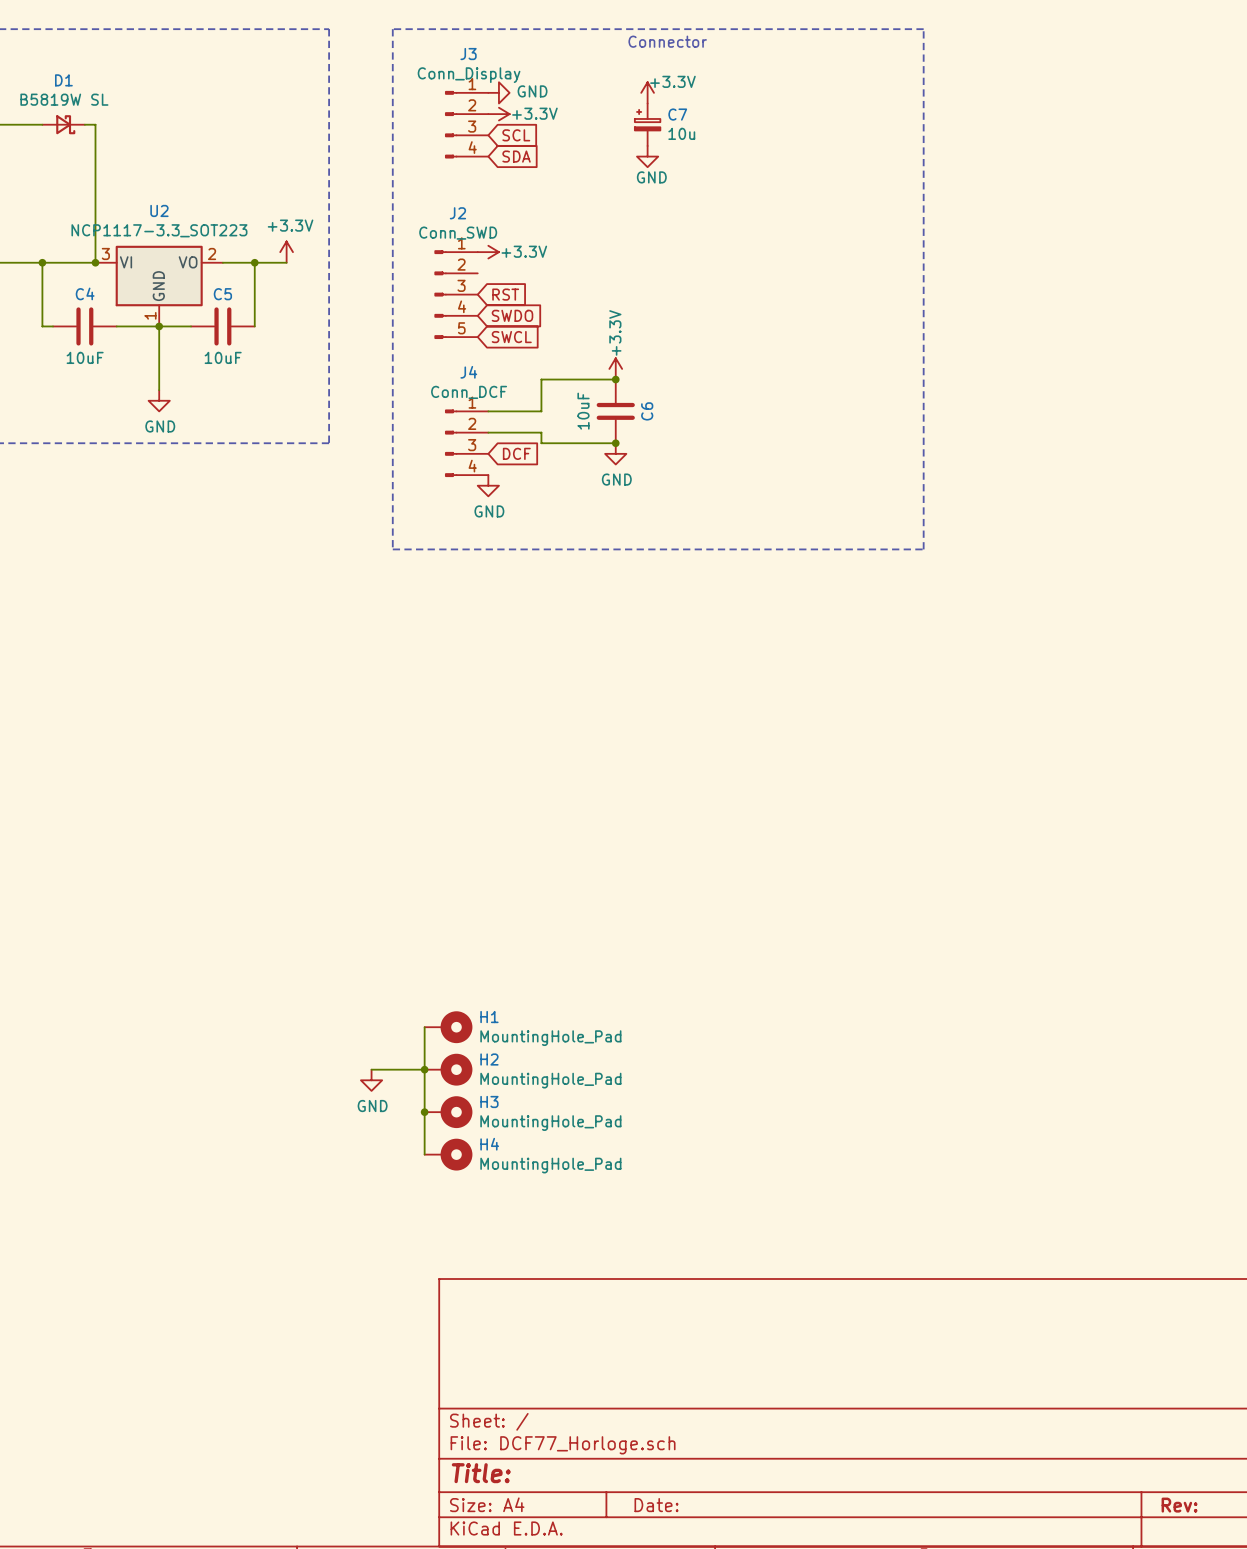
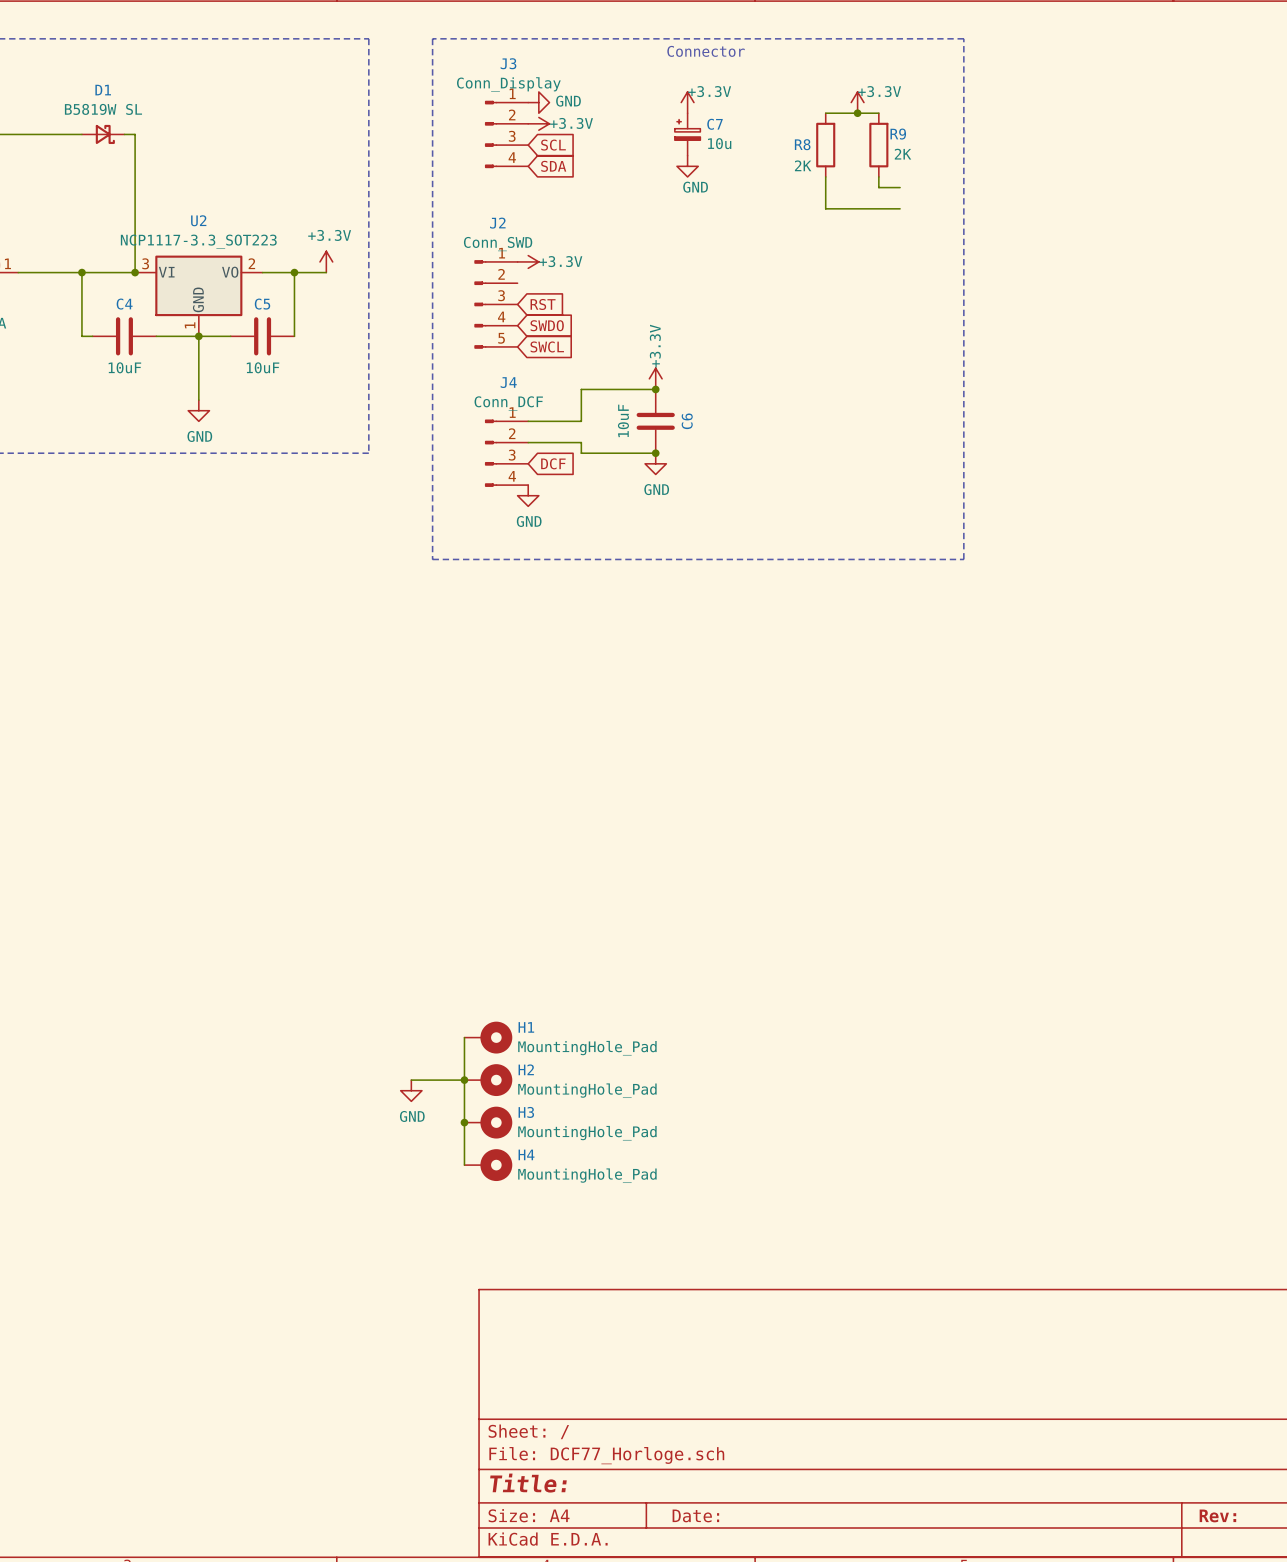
power symbol: none -> +3.3V (857, 102)
wire: none -> (825, 113) (878, 113)
junction: none -> (857, 113)
R8: none -> 2K (825, 145)
R9: none -> 2K (878, 145)
wire: none -> (825, 176) (825, 208) (900, 208)
wire: none -> (878, 176) (878, 187) (900, 187)

